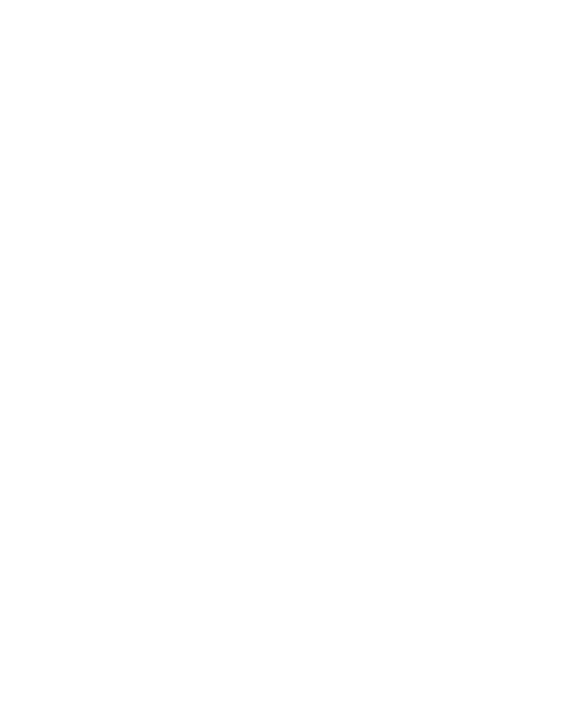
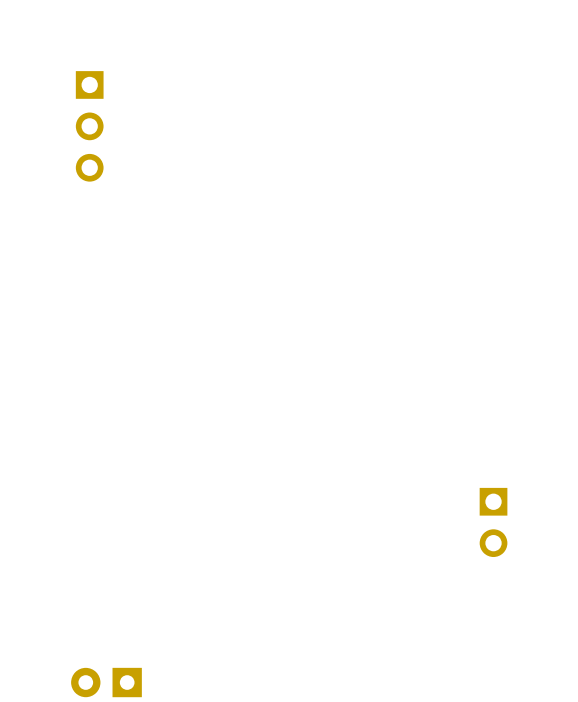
part: none -> (89, 126)
part: none -> (493, 522)
part: none -> (106, 682)

